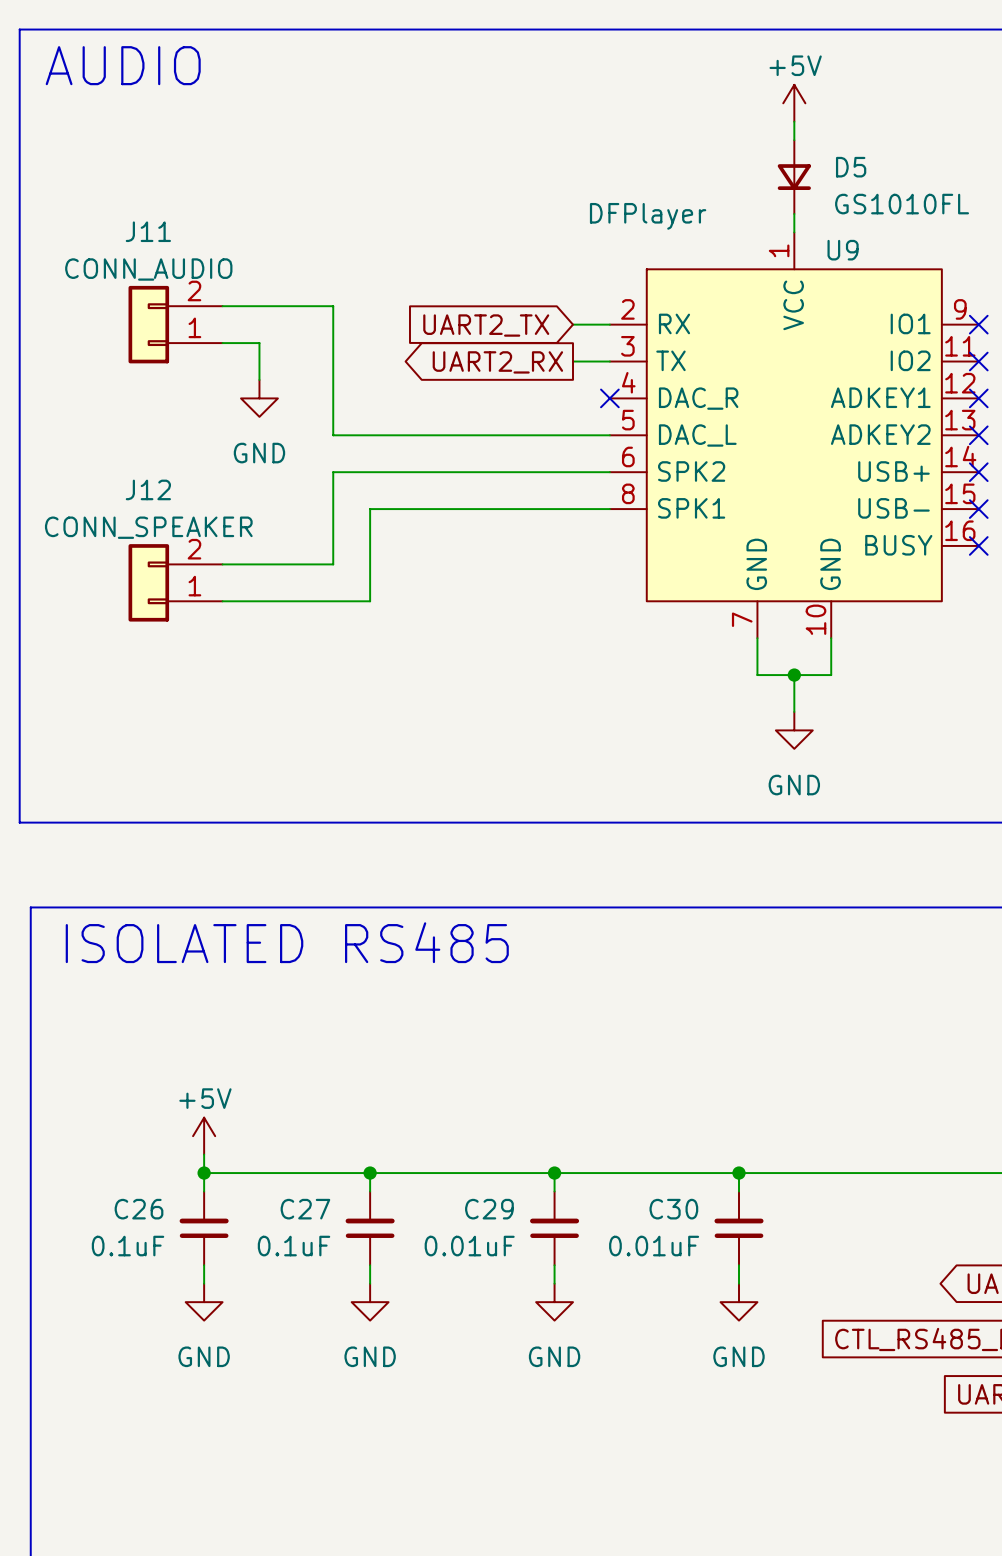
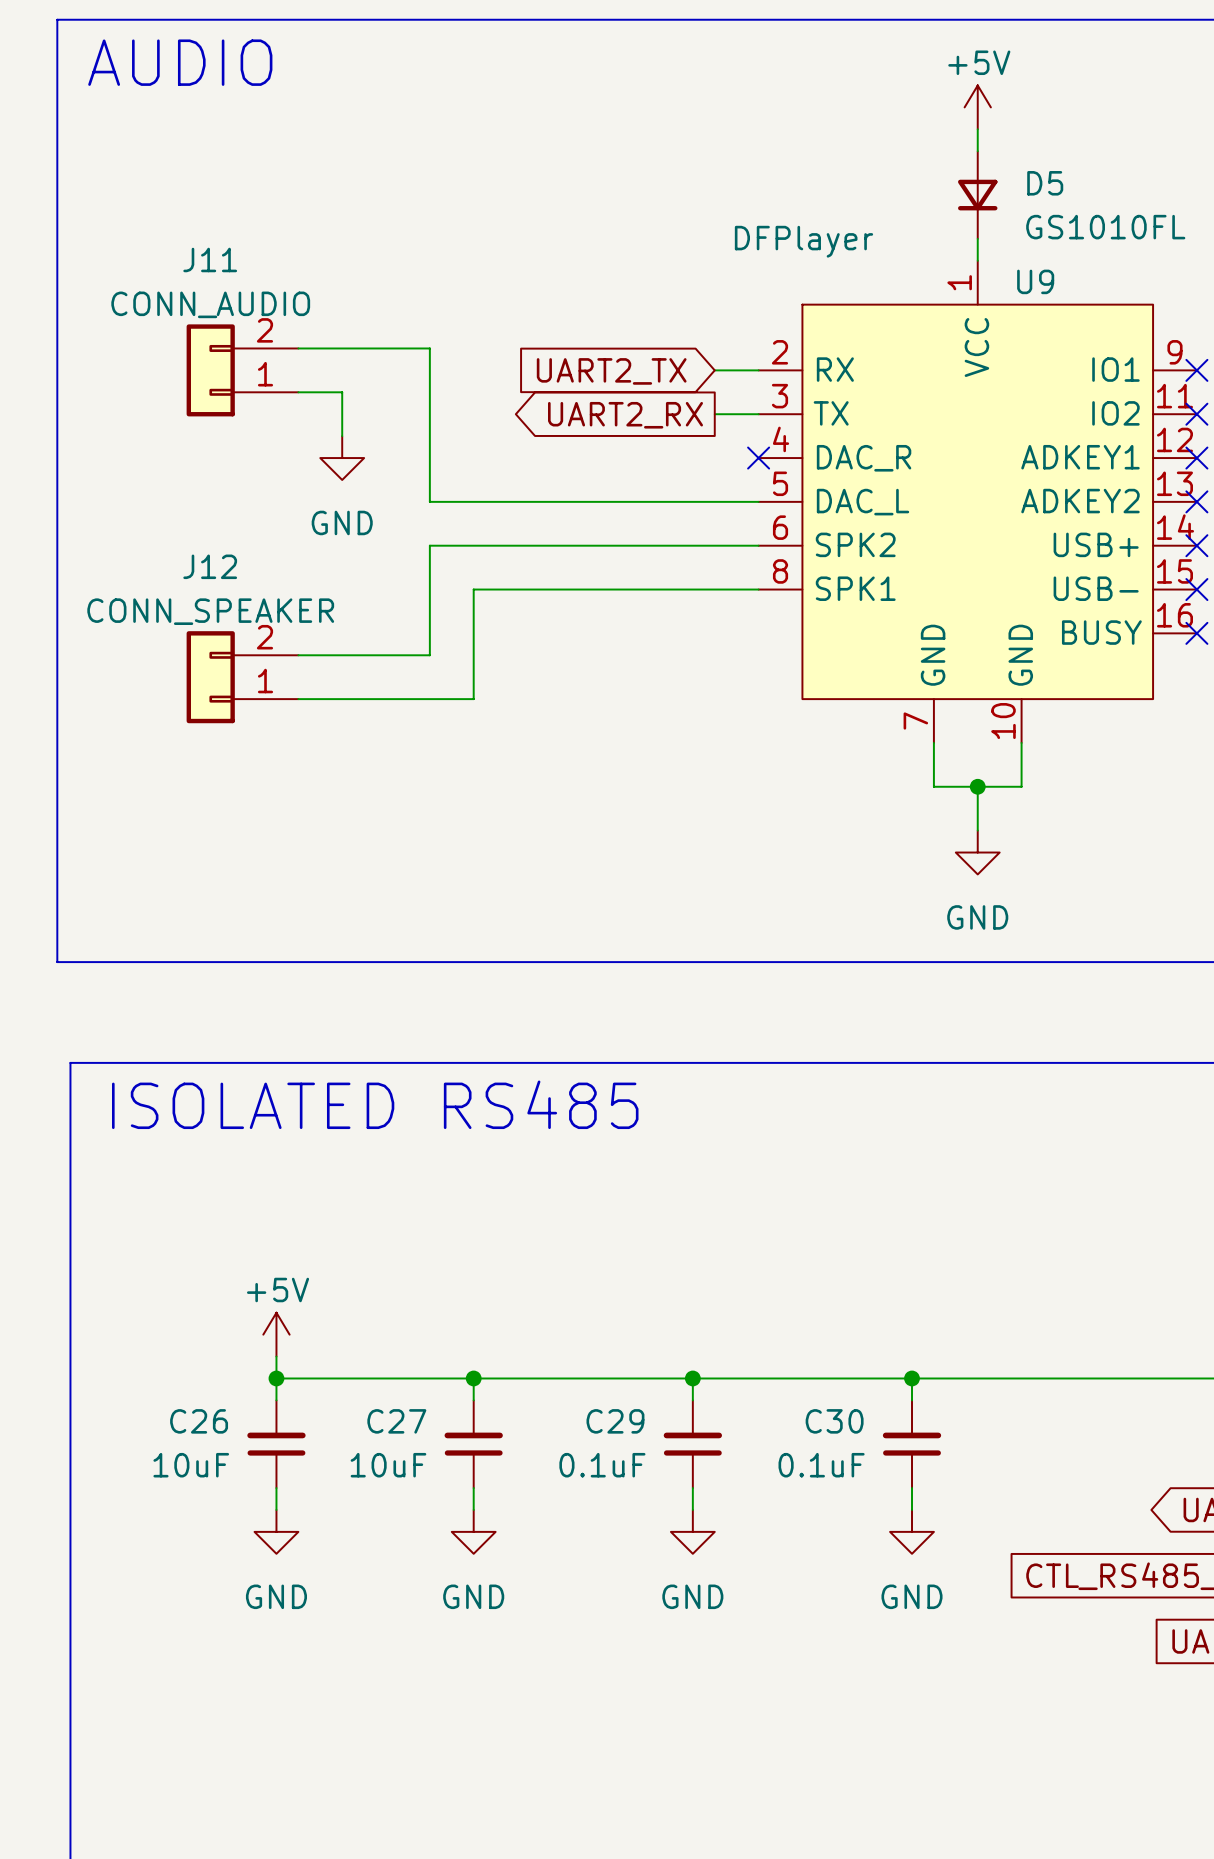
C26 value: 0.1uF (128, 1246) -> 10uF (191, 1465)
C27 value: 0.1uF (294, 1246) -> 10uF (388, 1465)
C29 value: 0.01uF (469, 1246) -> 0.1uF (602, 1465)
C30 value: 0.01uF (654, 1246) -> 0.1uF (821, 1465)

